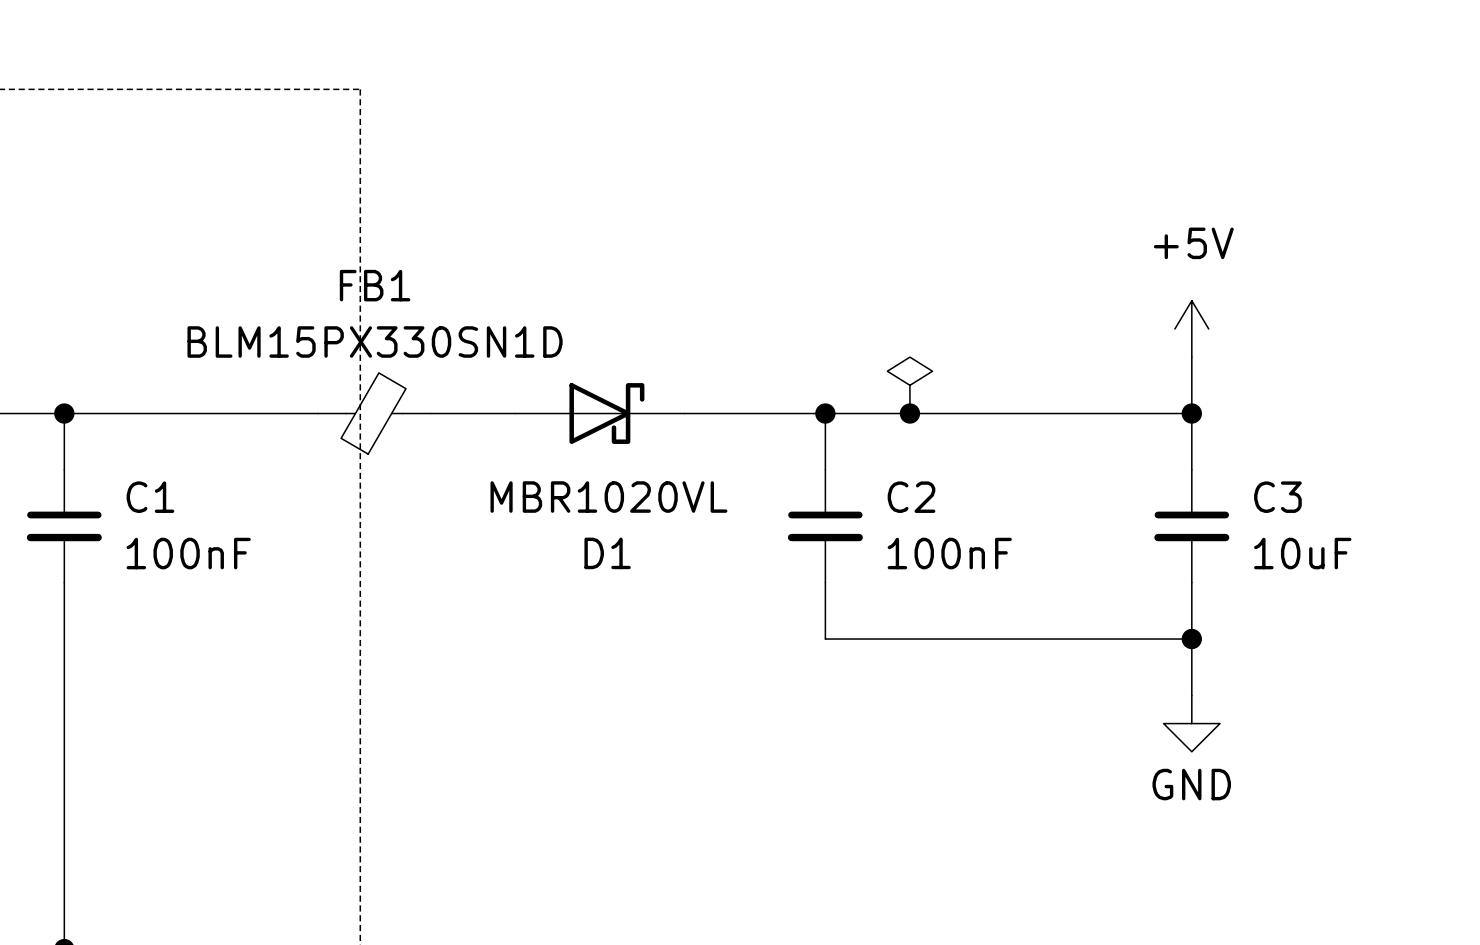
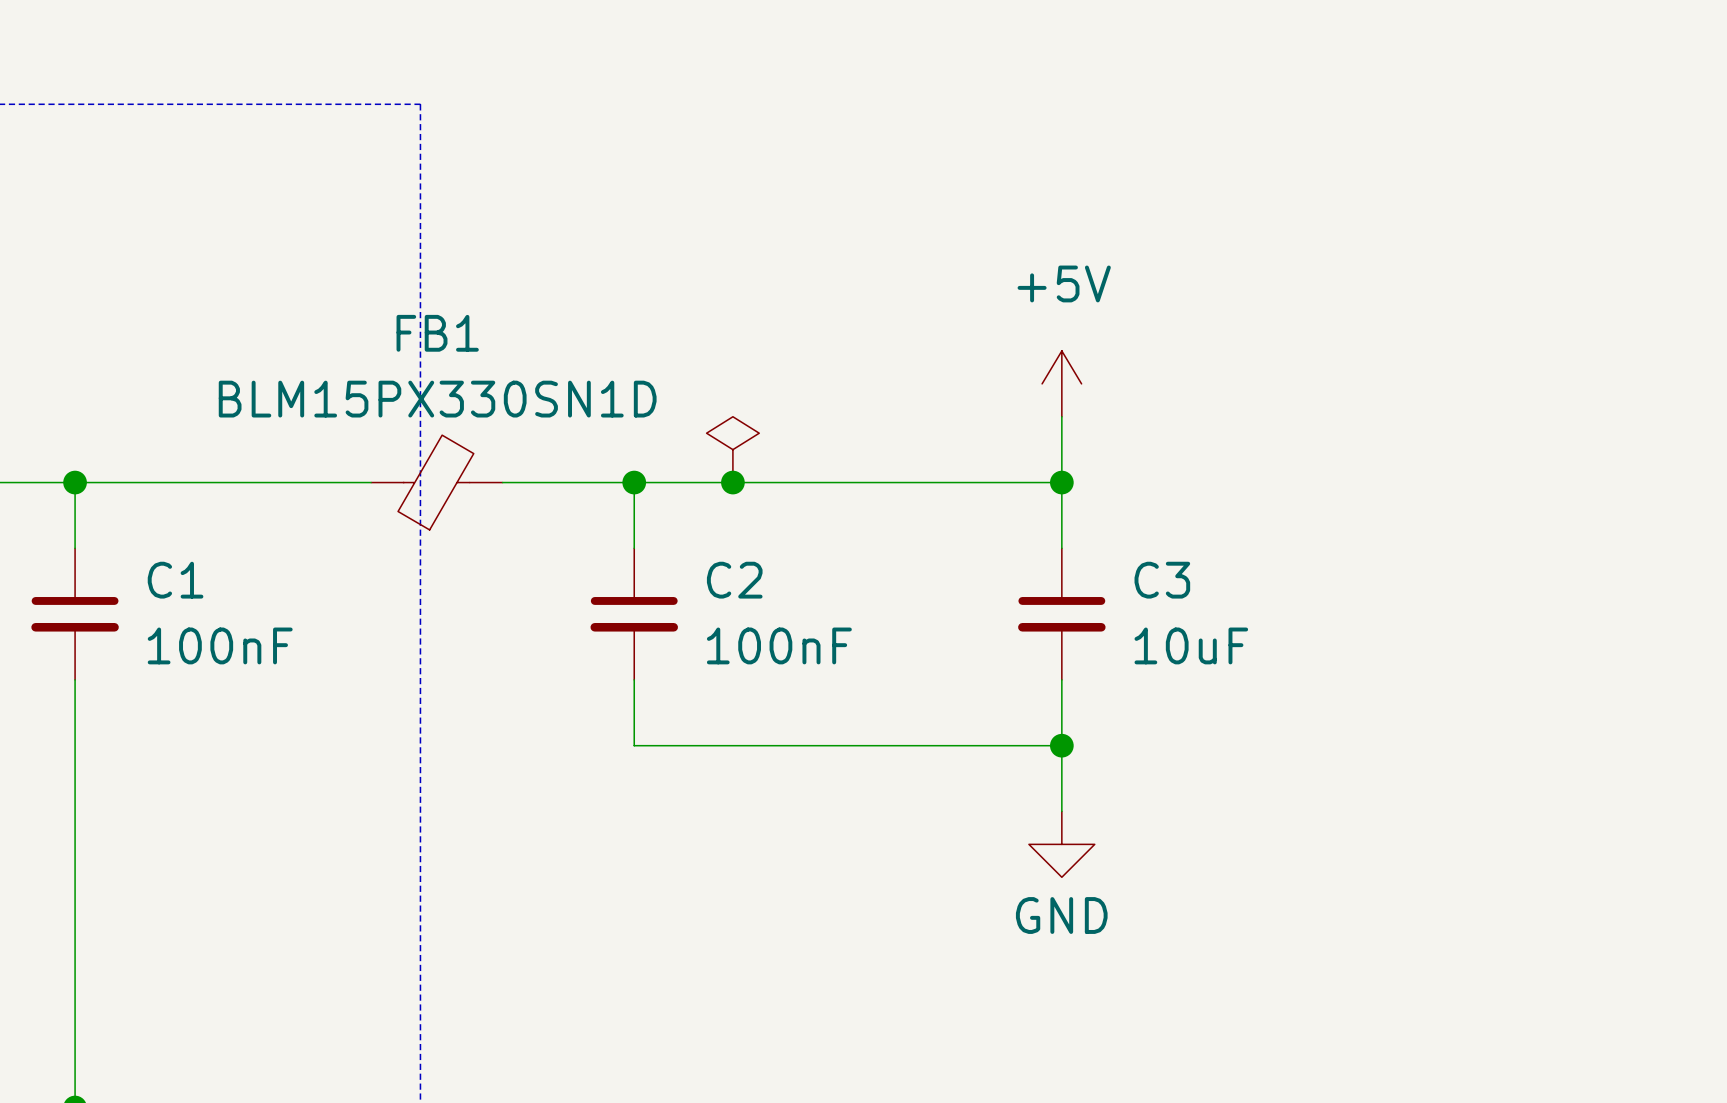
power symbol position: +5V (1191, 328) -> +5V (1061, 383)
wire: (1191, 357) (1191, 469) -> (1061, 416) (1061, 548)
power symbol position: (909, 385) -> (732, 449)
junction: none -> (634, 482)
D1: MBR1020VL (599, 413) -> none
junction: none -> (732, 482)
wire: (825, 413) (825, 469) -> (634, 482) (634, 548)
junction: (825, 413) -> none
wire: (909, 413) (1191, 413) -> none
junction: (1191, 413) -> none
C2 position: (825, 526) -> (634, 614)
C3 position: (1191, 526) -> (1061, 614)
wire: (825, 582) (825, 639) -> (634, 679) (634, 745) (963, 745)
wire: (1191, 582) (1191, 695) -> (1061, 679) (1061, 811)
wire: (909, 639) (1191, 639) -> none
junction: none -> (1061, 745)
junction: (1191, 639) -> none
power symbol position: GND (1191, 723) -> GND (1061, 844)

